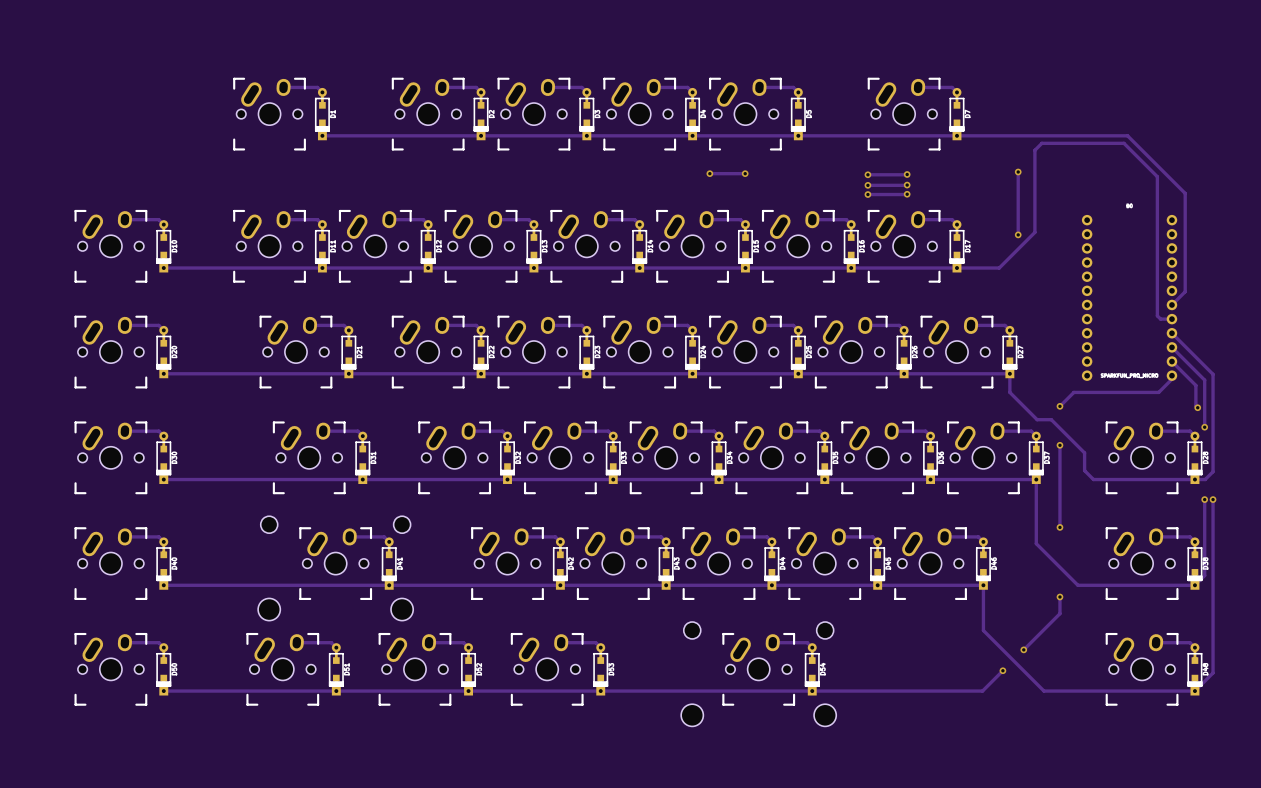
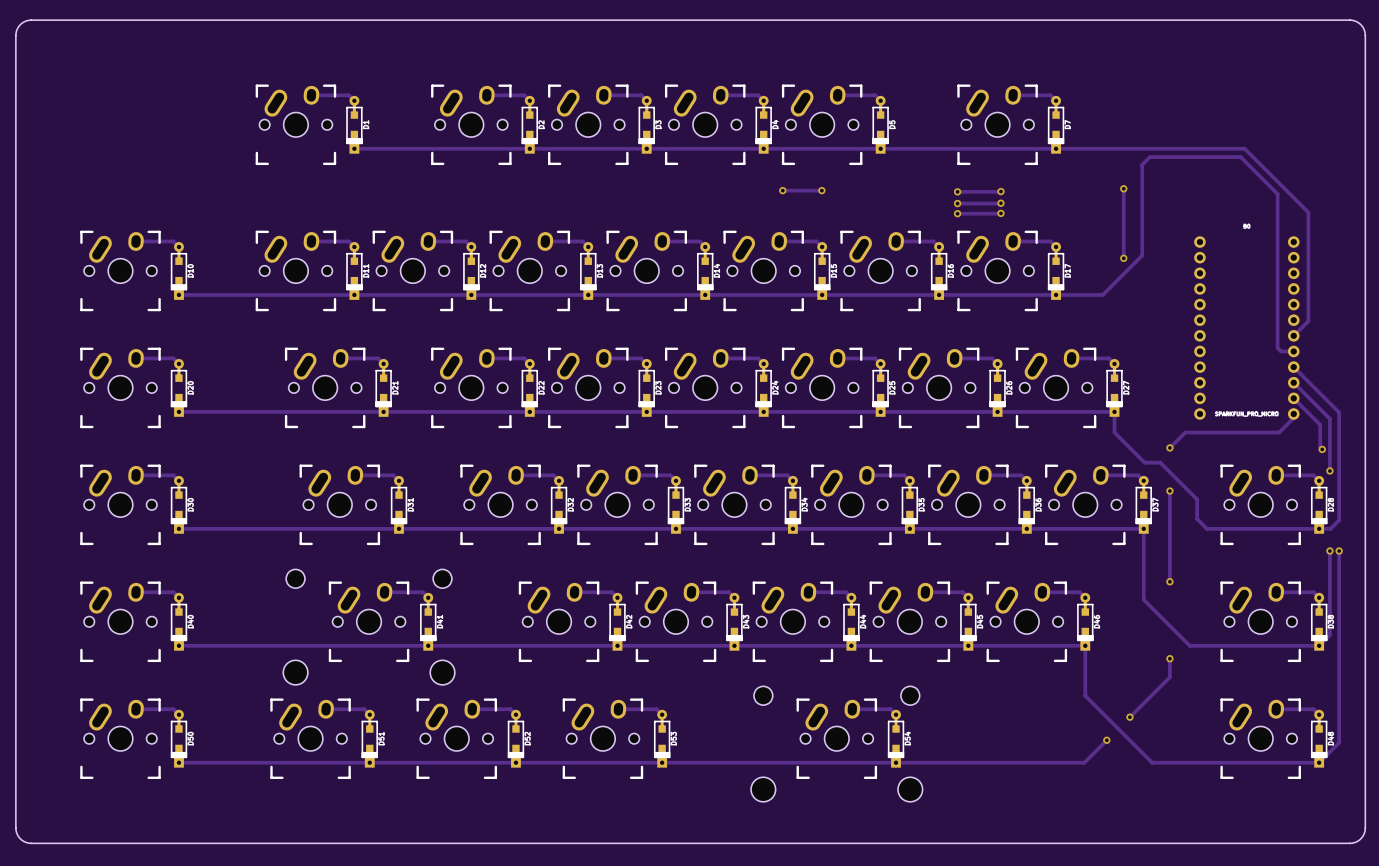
board edge: none -> (31, 20) (1349, 20) (1357, 22) (1363, 27) (1365, 35) (1365, 827) (1363, 835) (1357, 841) (1349, 843) (31, 843) (23, 841) (17, 835) (15, 827) (15, 35) (20, 24) (31, 20)

